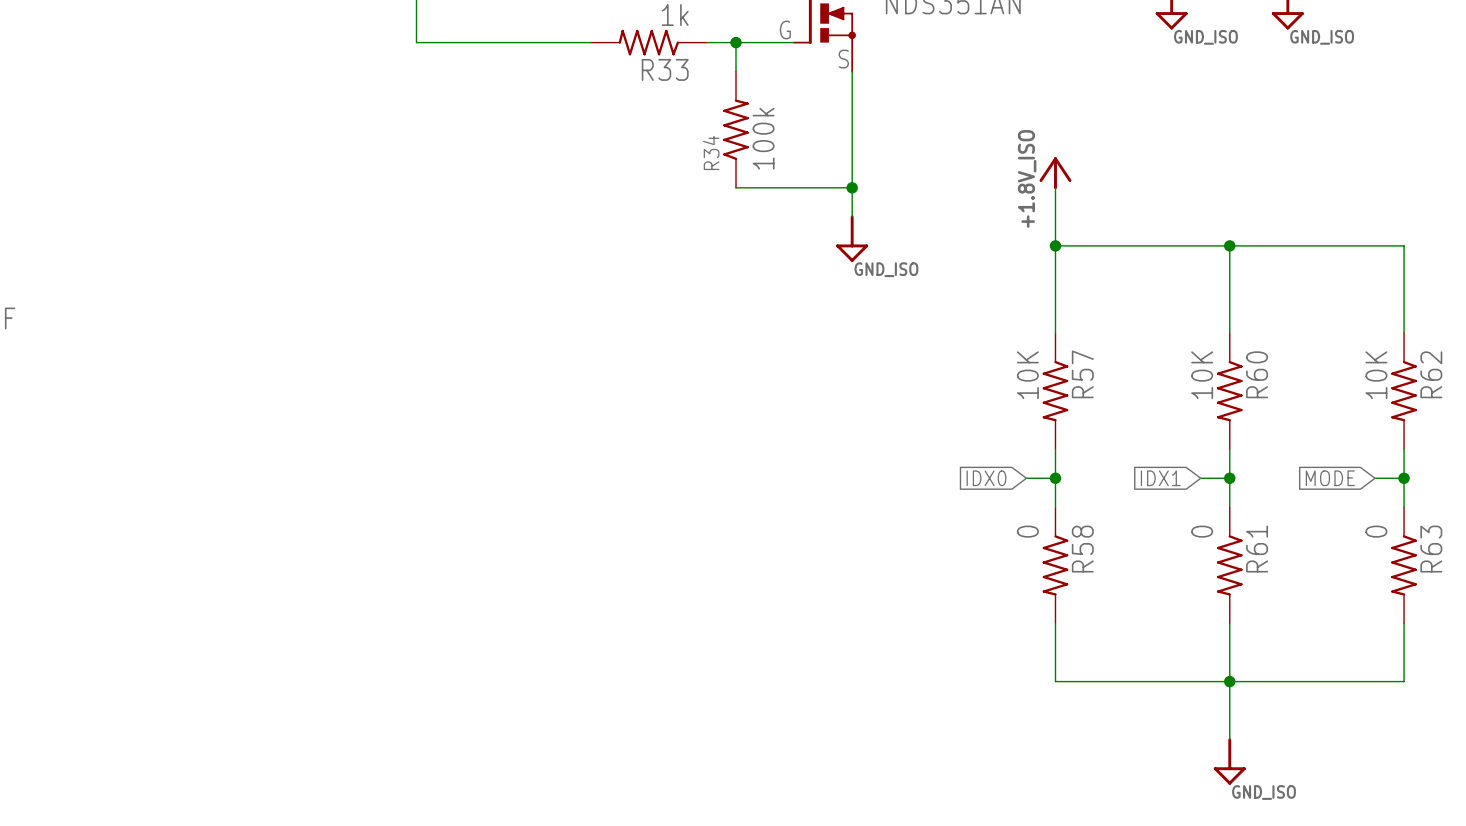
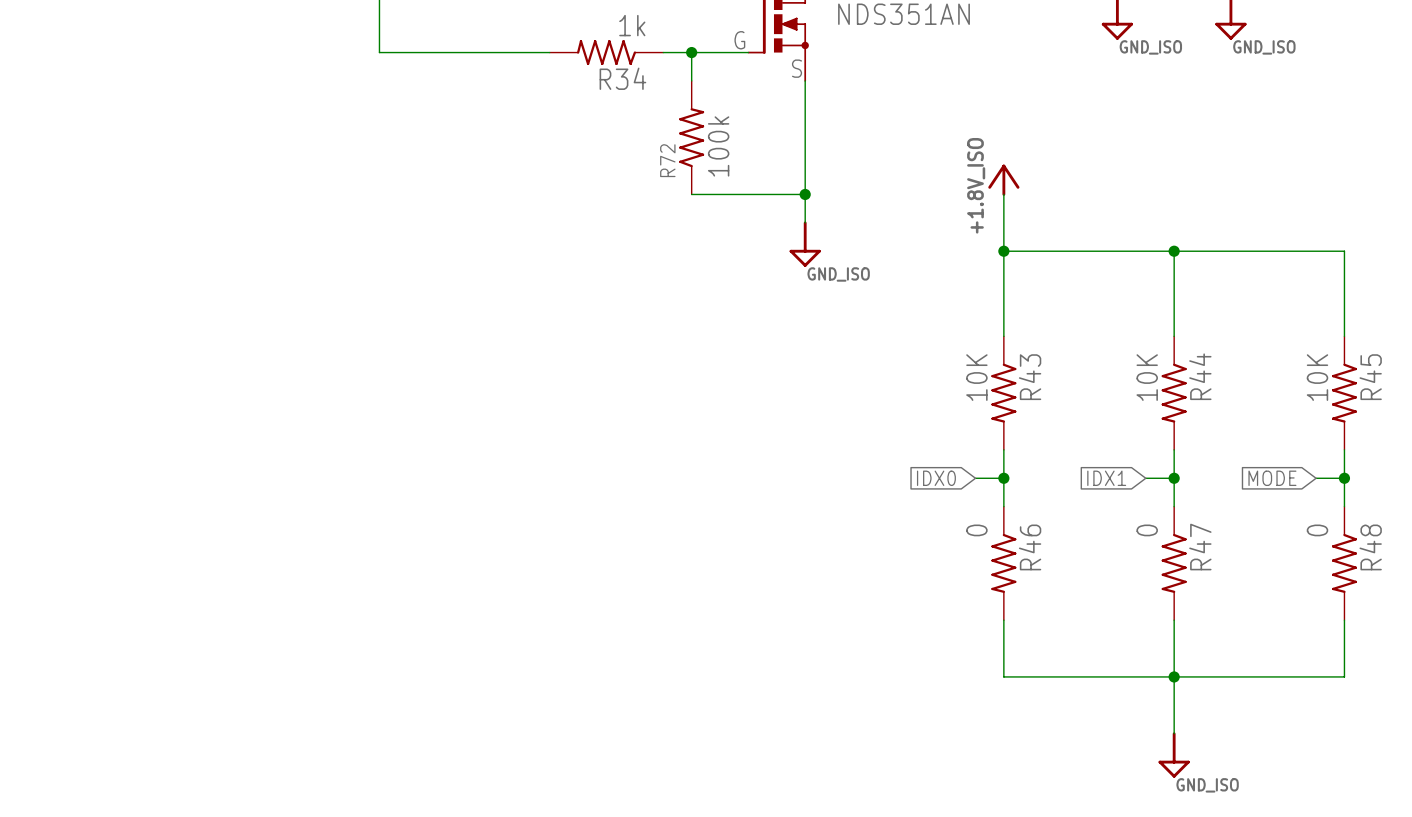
R33 name: R33 (665, 69) -> R34 (622, 78)
R34 name: R34 (711, 152) -> R72 (667, 160)
R57 name: R57 (1082, 374) -> R43 (1030, 377)
R60 name: R60 (1257, 374) -> R44 (1200, 376)
R62 name: R62 (1431, 374) -> R45 (1370, 377)
R58 name: R58 (1082, 549) -> R46 (1030, 547)
R61 name: R61 (1257, 549) -> R47 (1200, 547)
R63 name: R63 (1431, 549) -> R48 (1370, 547)

